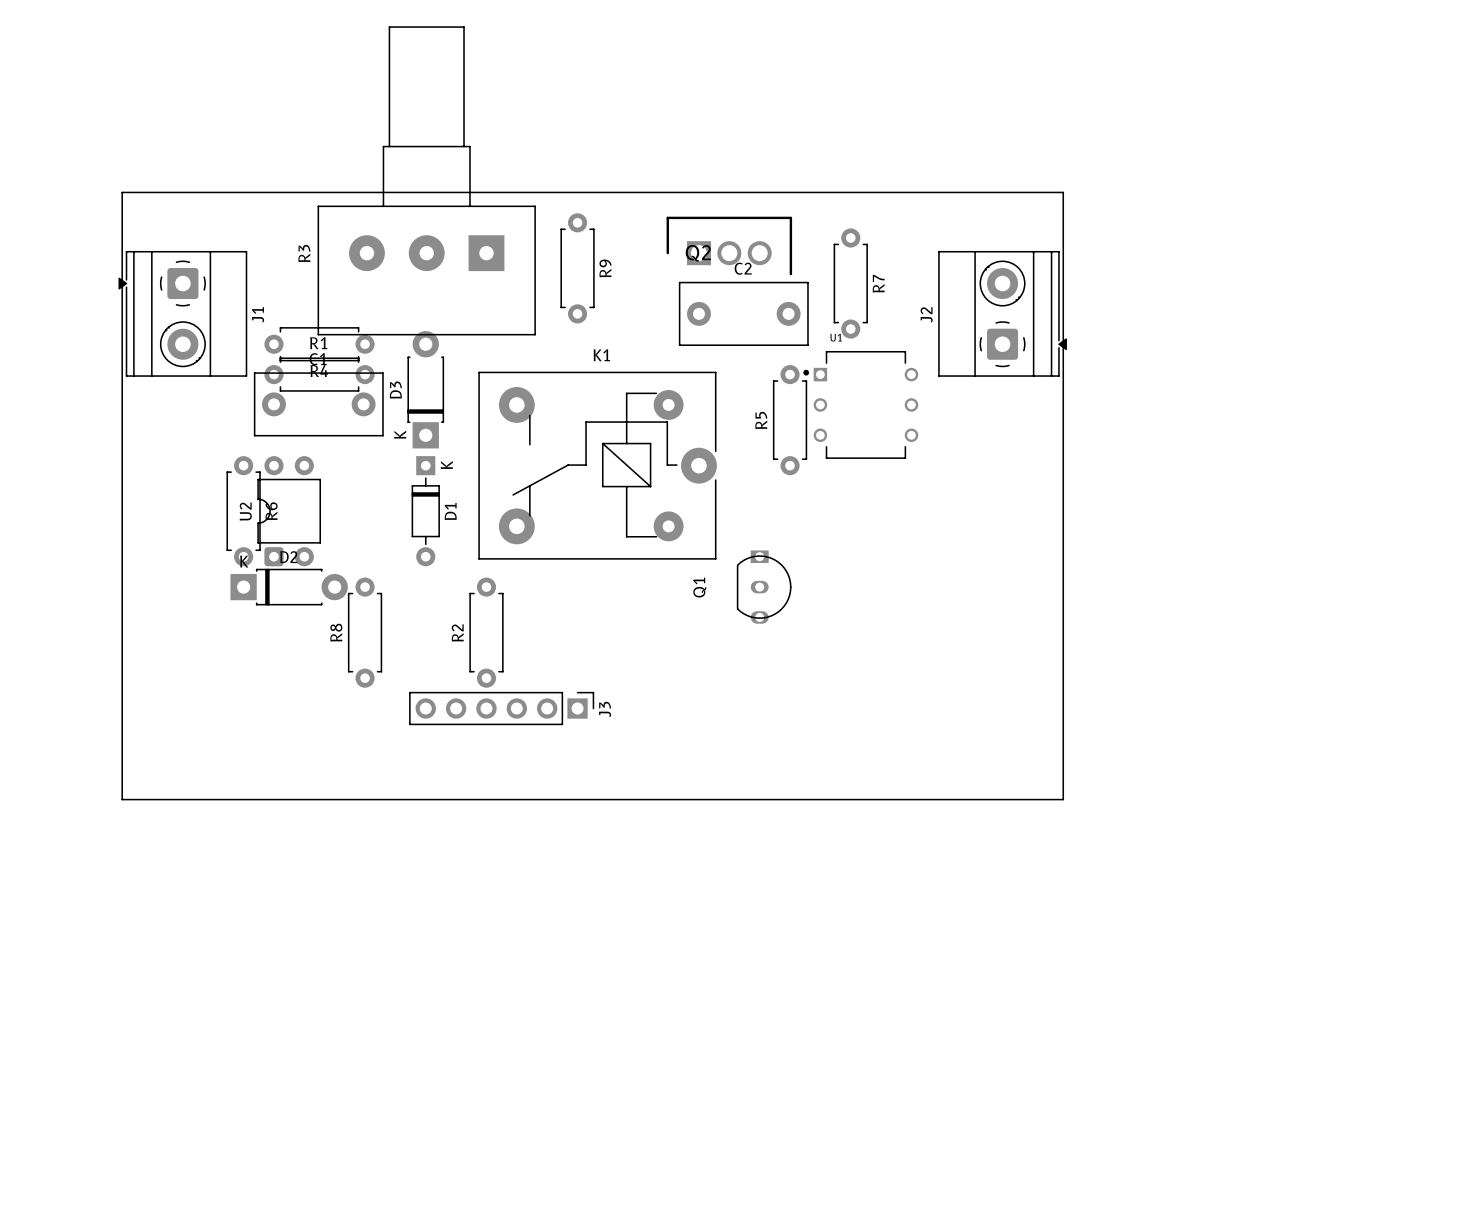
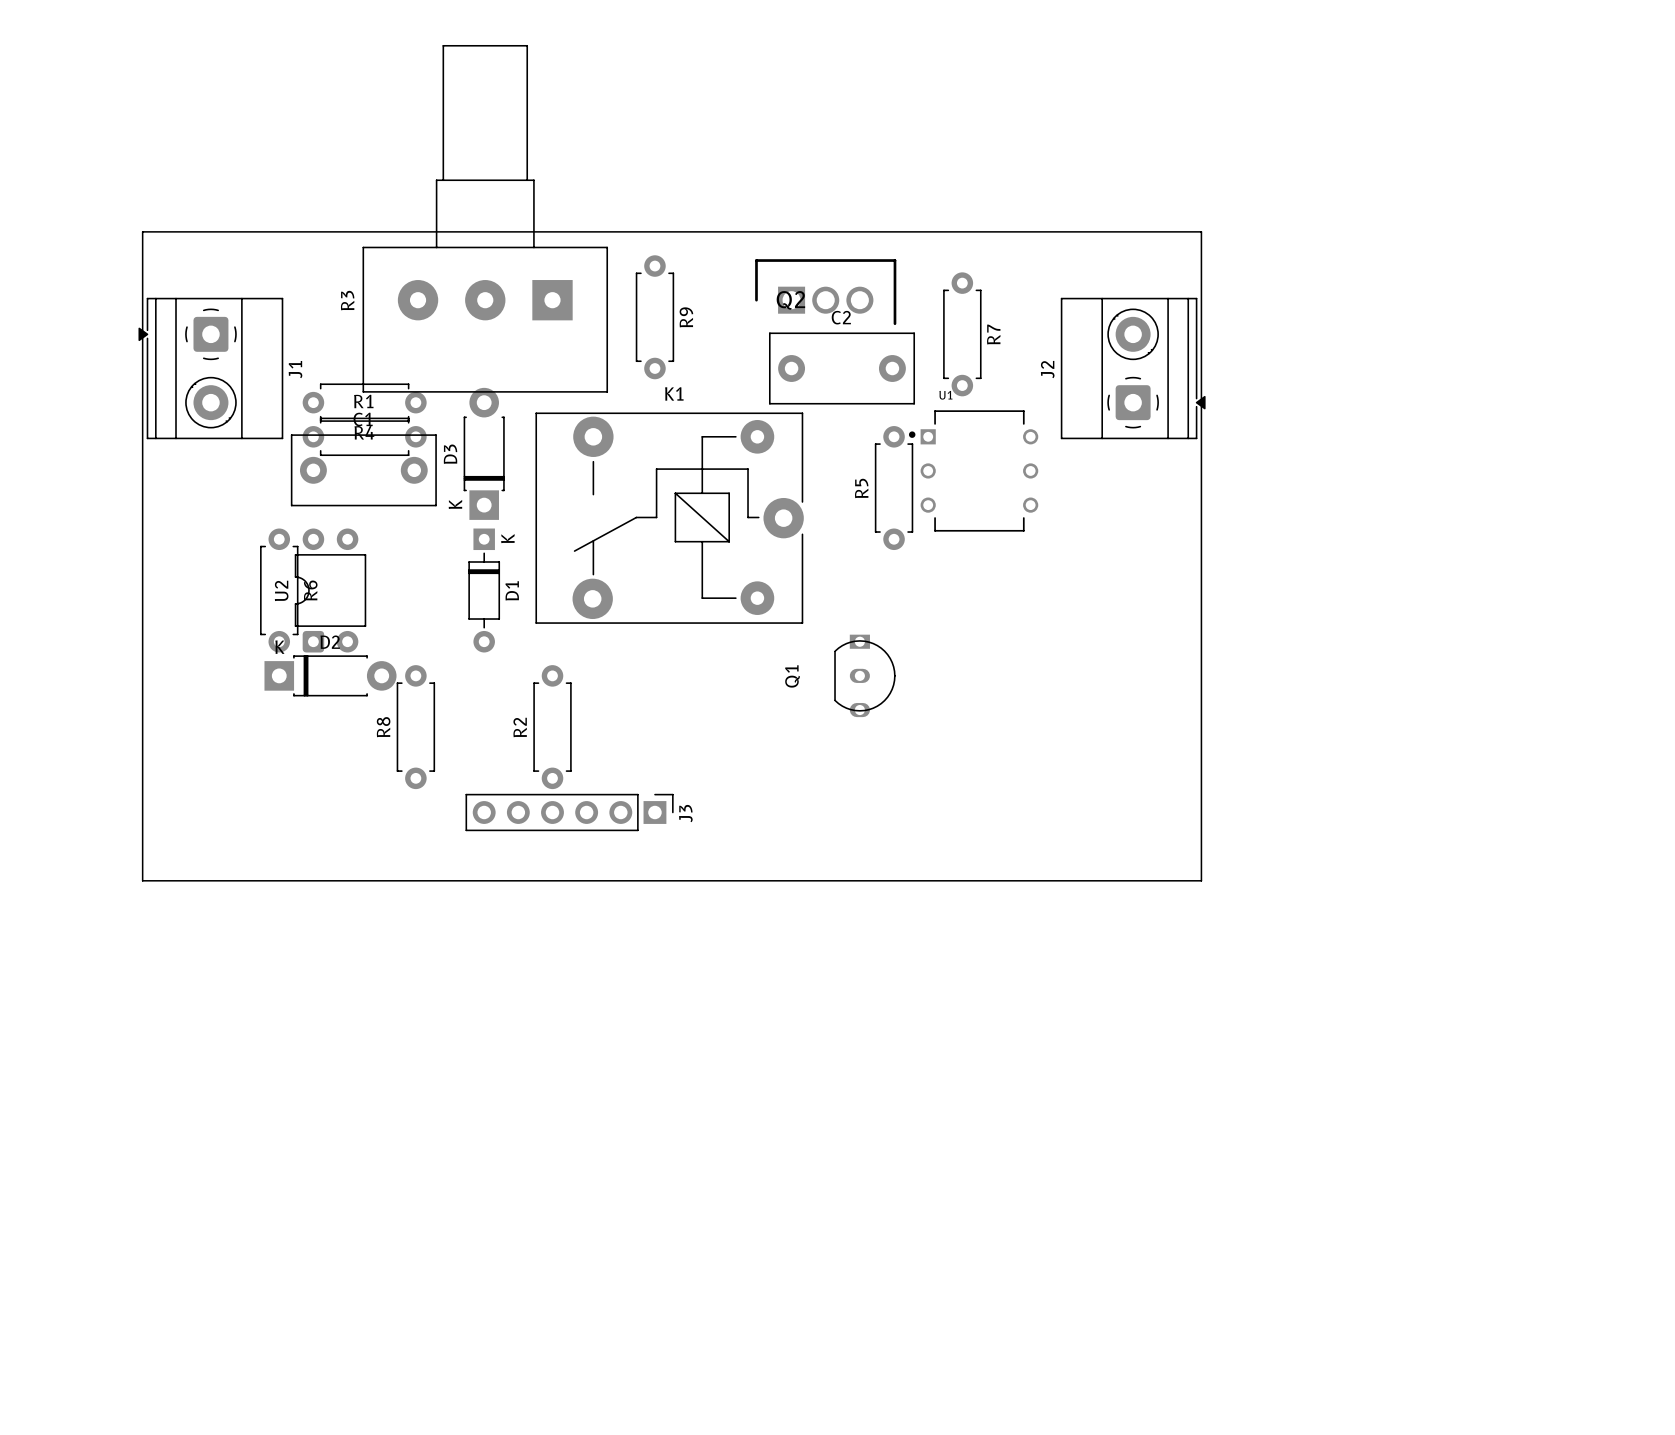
K1 footprint: [478, 371, 717, 560] -> [535, 412, 804, 624]
board edge: (122, 769) (122, 799) (1063, 799) (1063, 769) -> (142, 880) (1201, 880)

